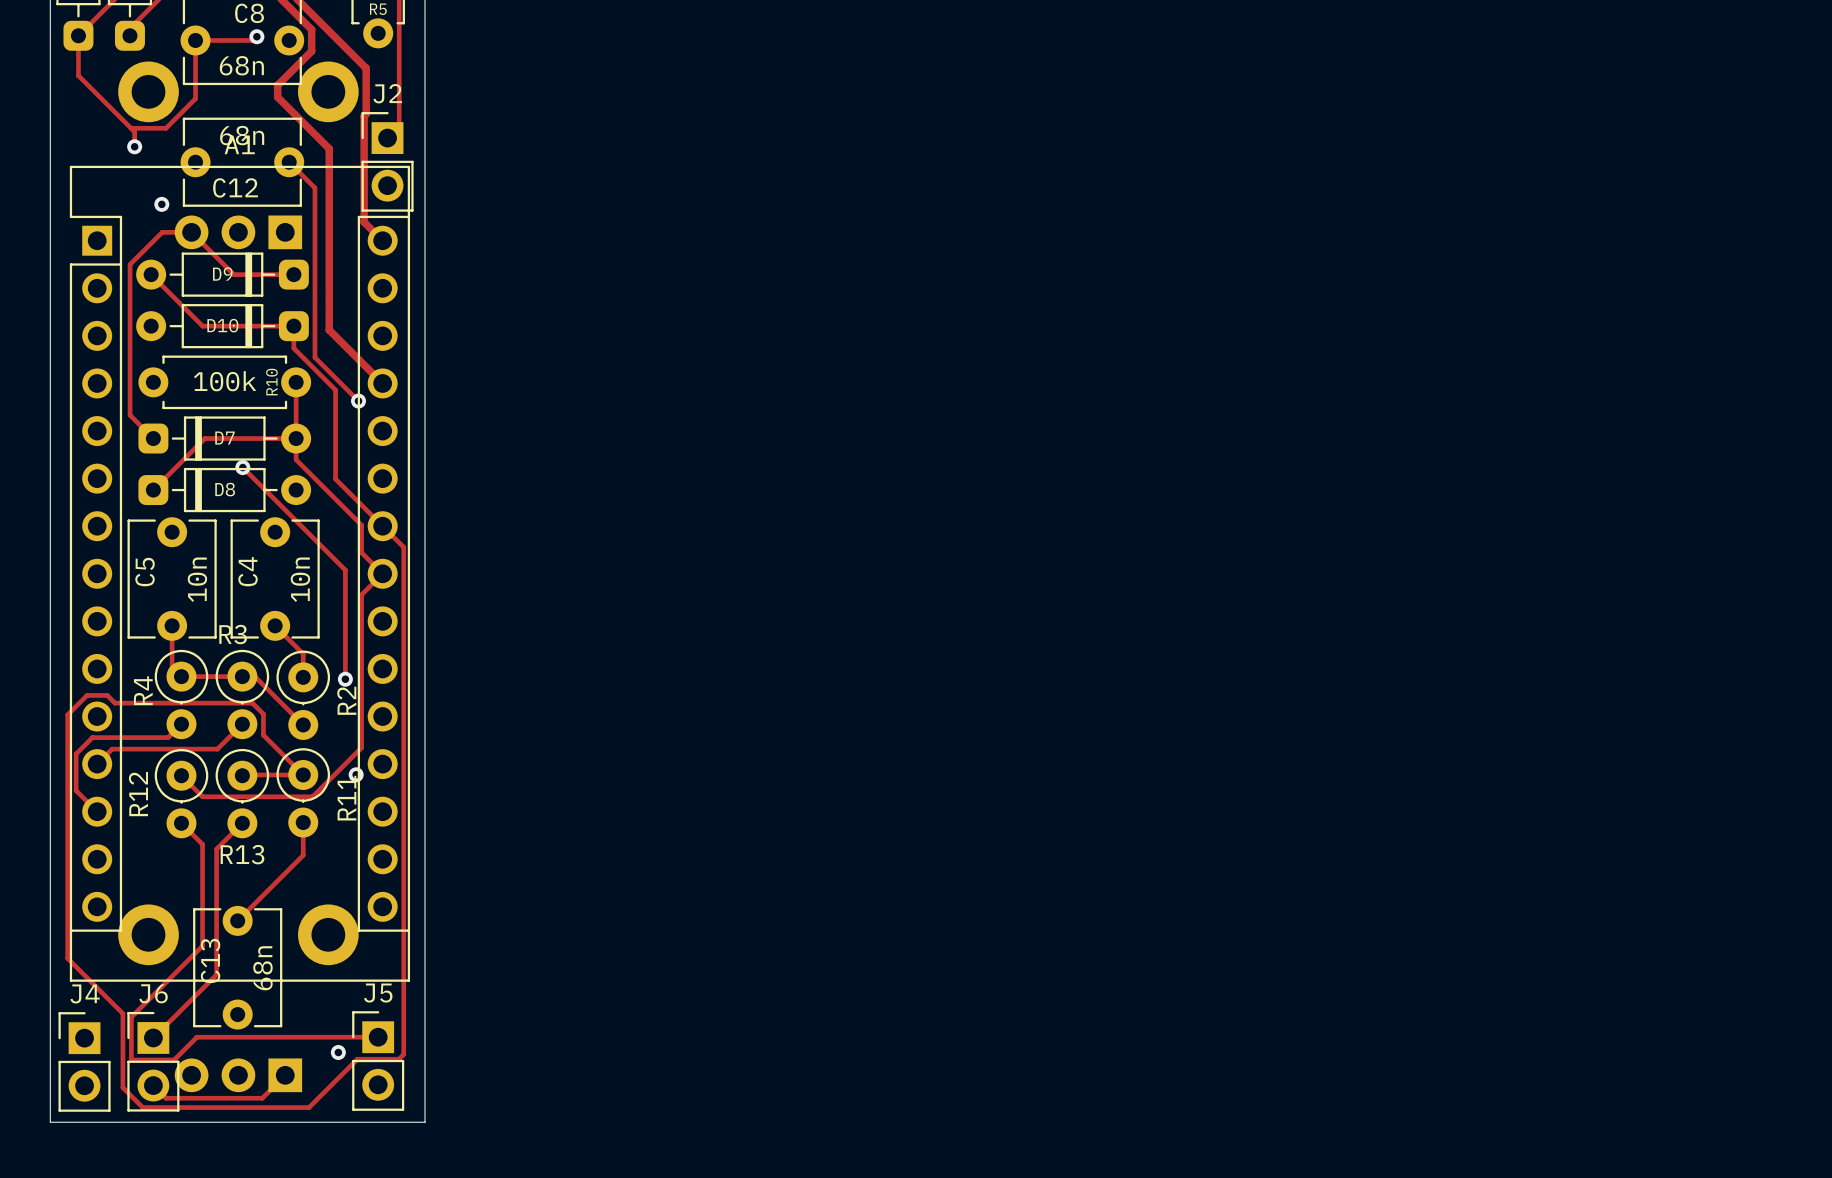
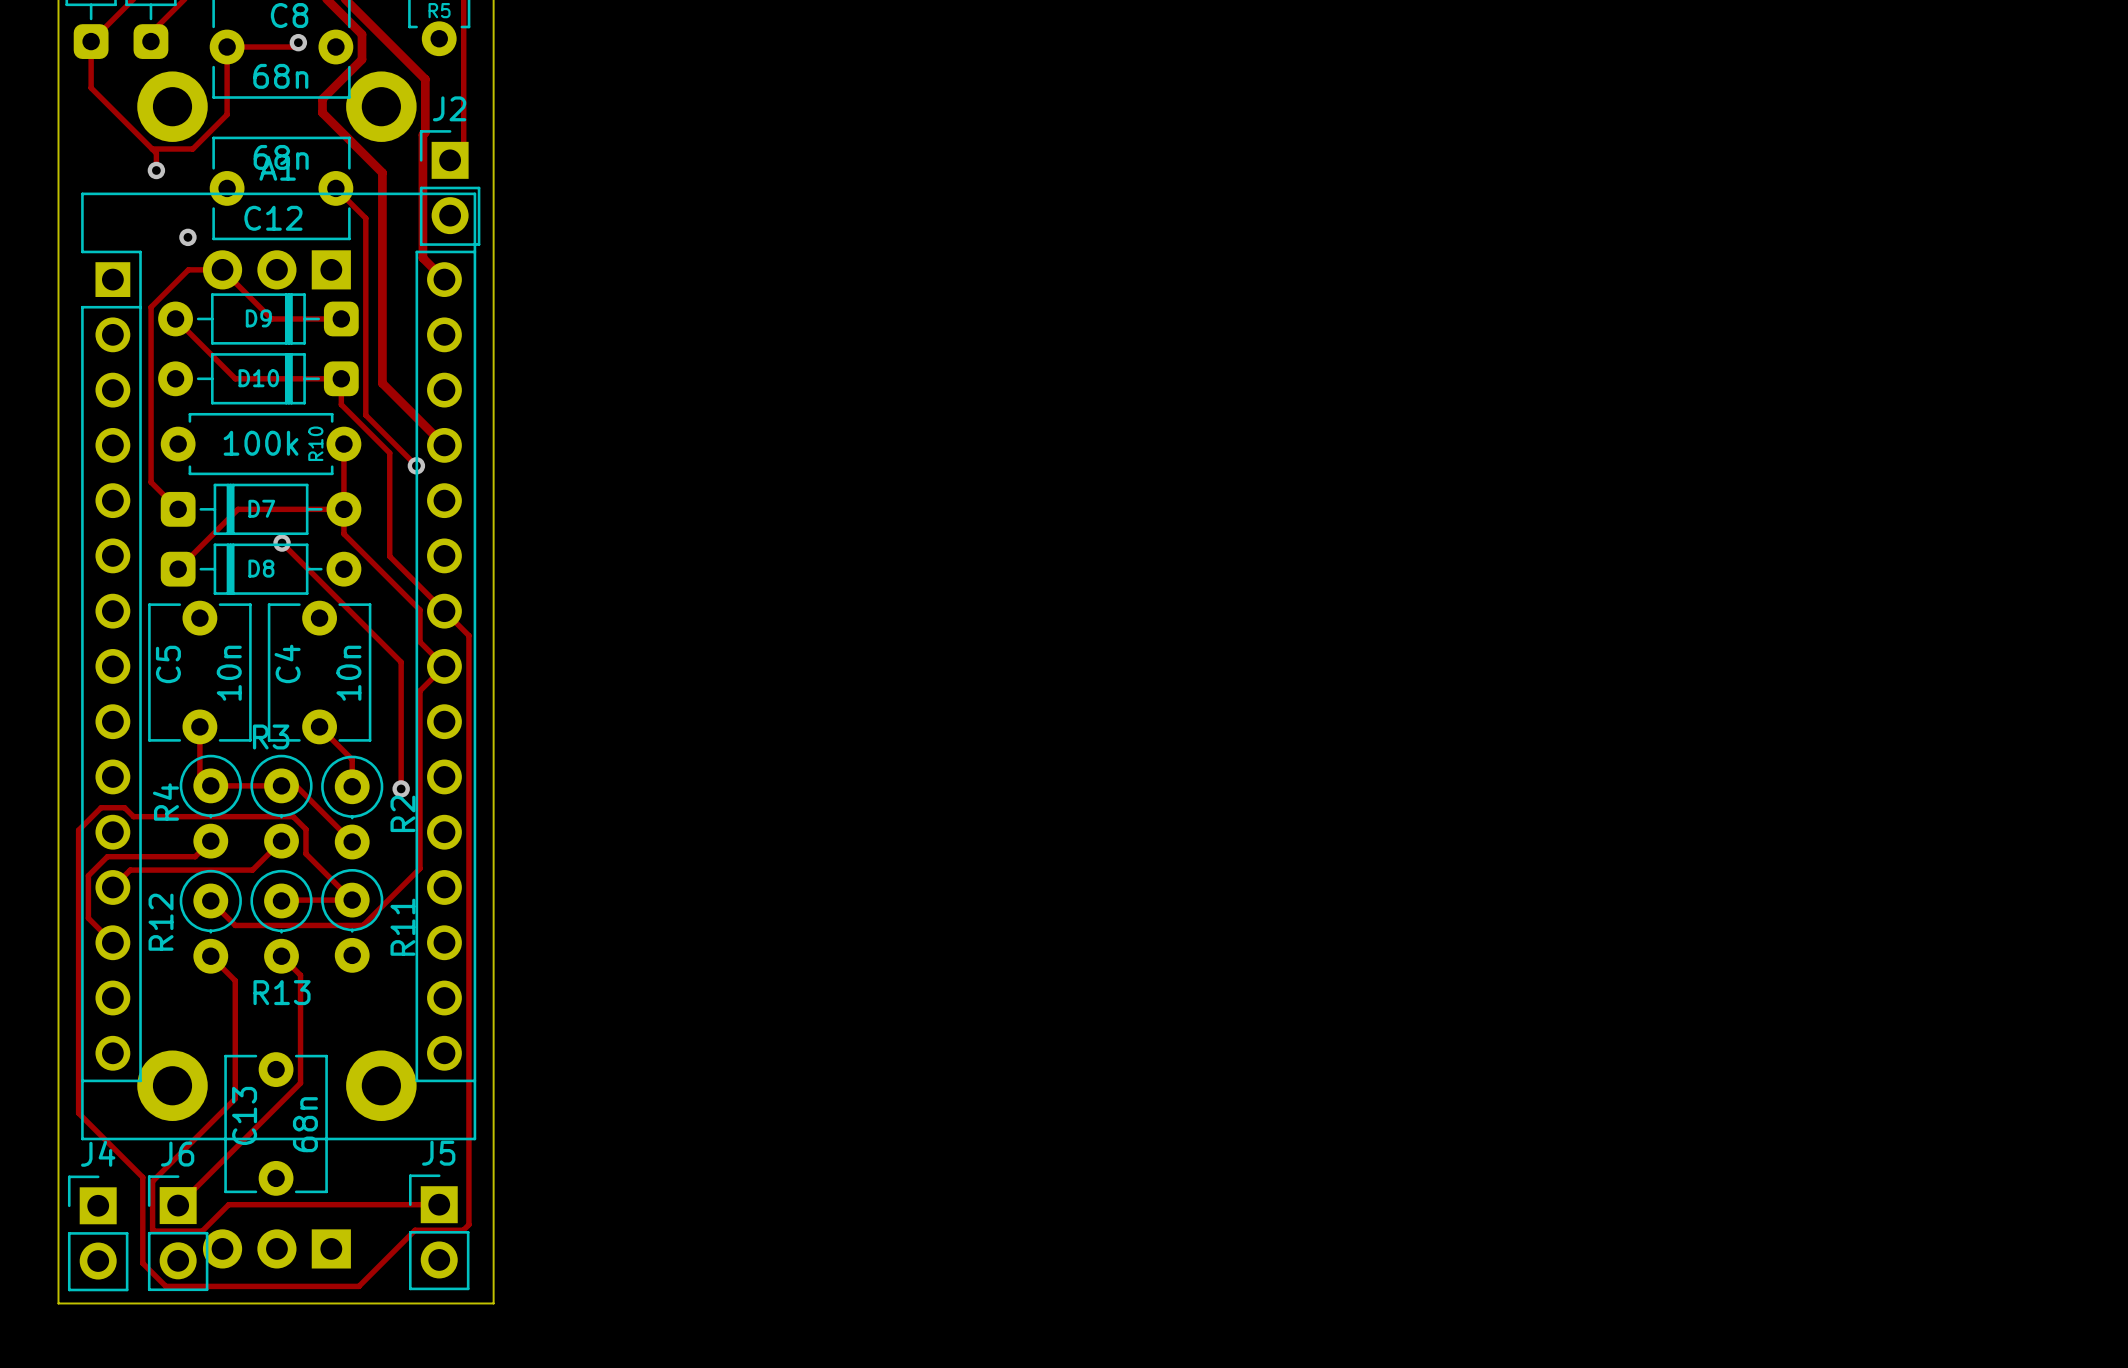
via: (356, 774) -> none
track: (303, 822) (303, 855) (237, 920) -> none
track: (242, 823) (216, 849) (216, 974) -> (281, 956) (300, 975) (300, 1083) (251, 1132)
via: (338, 1052) -> none
track: (285, 1075) (262, 1098) (166, 1098) (153, 1085) -> none

